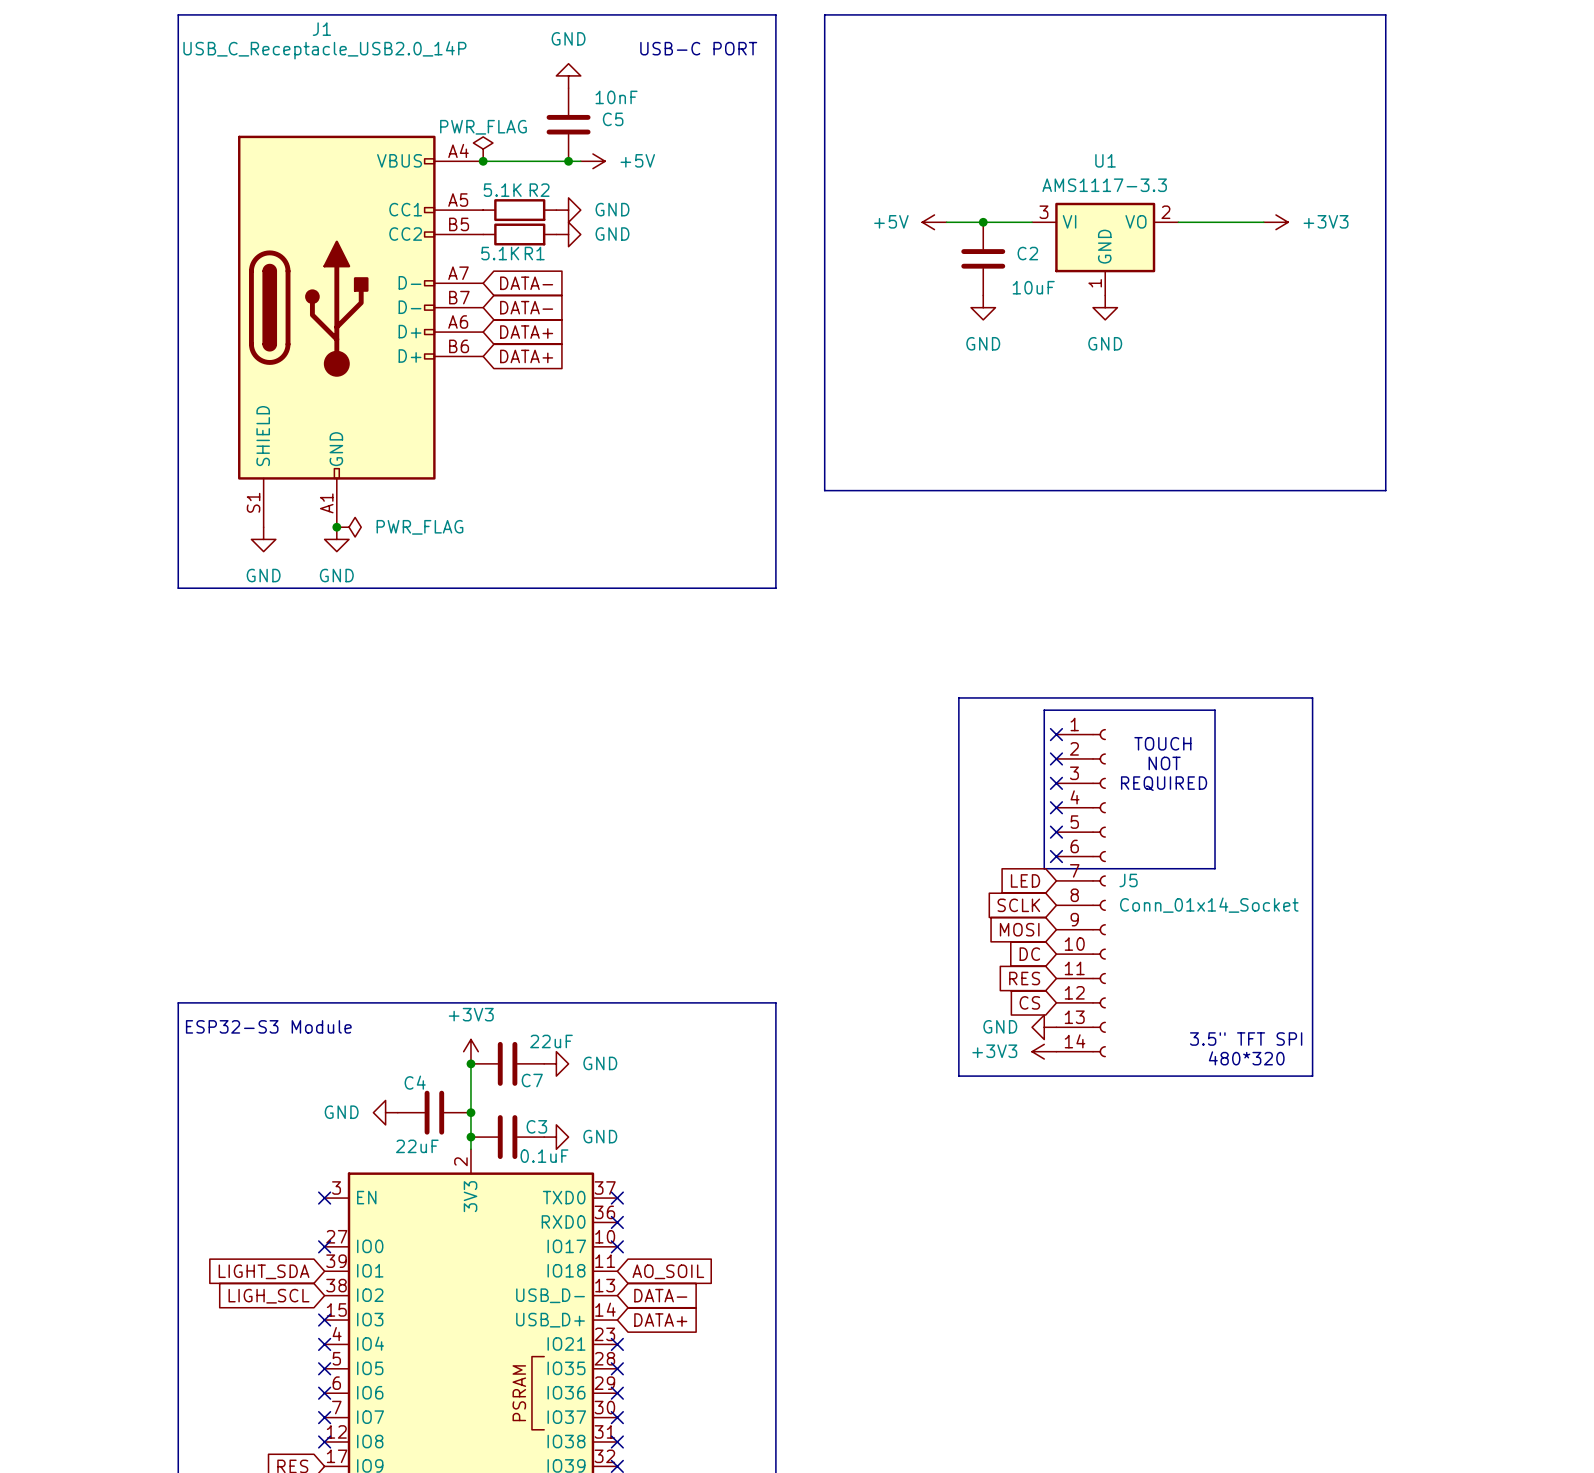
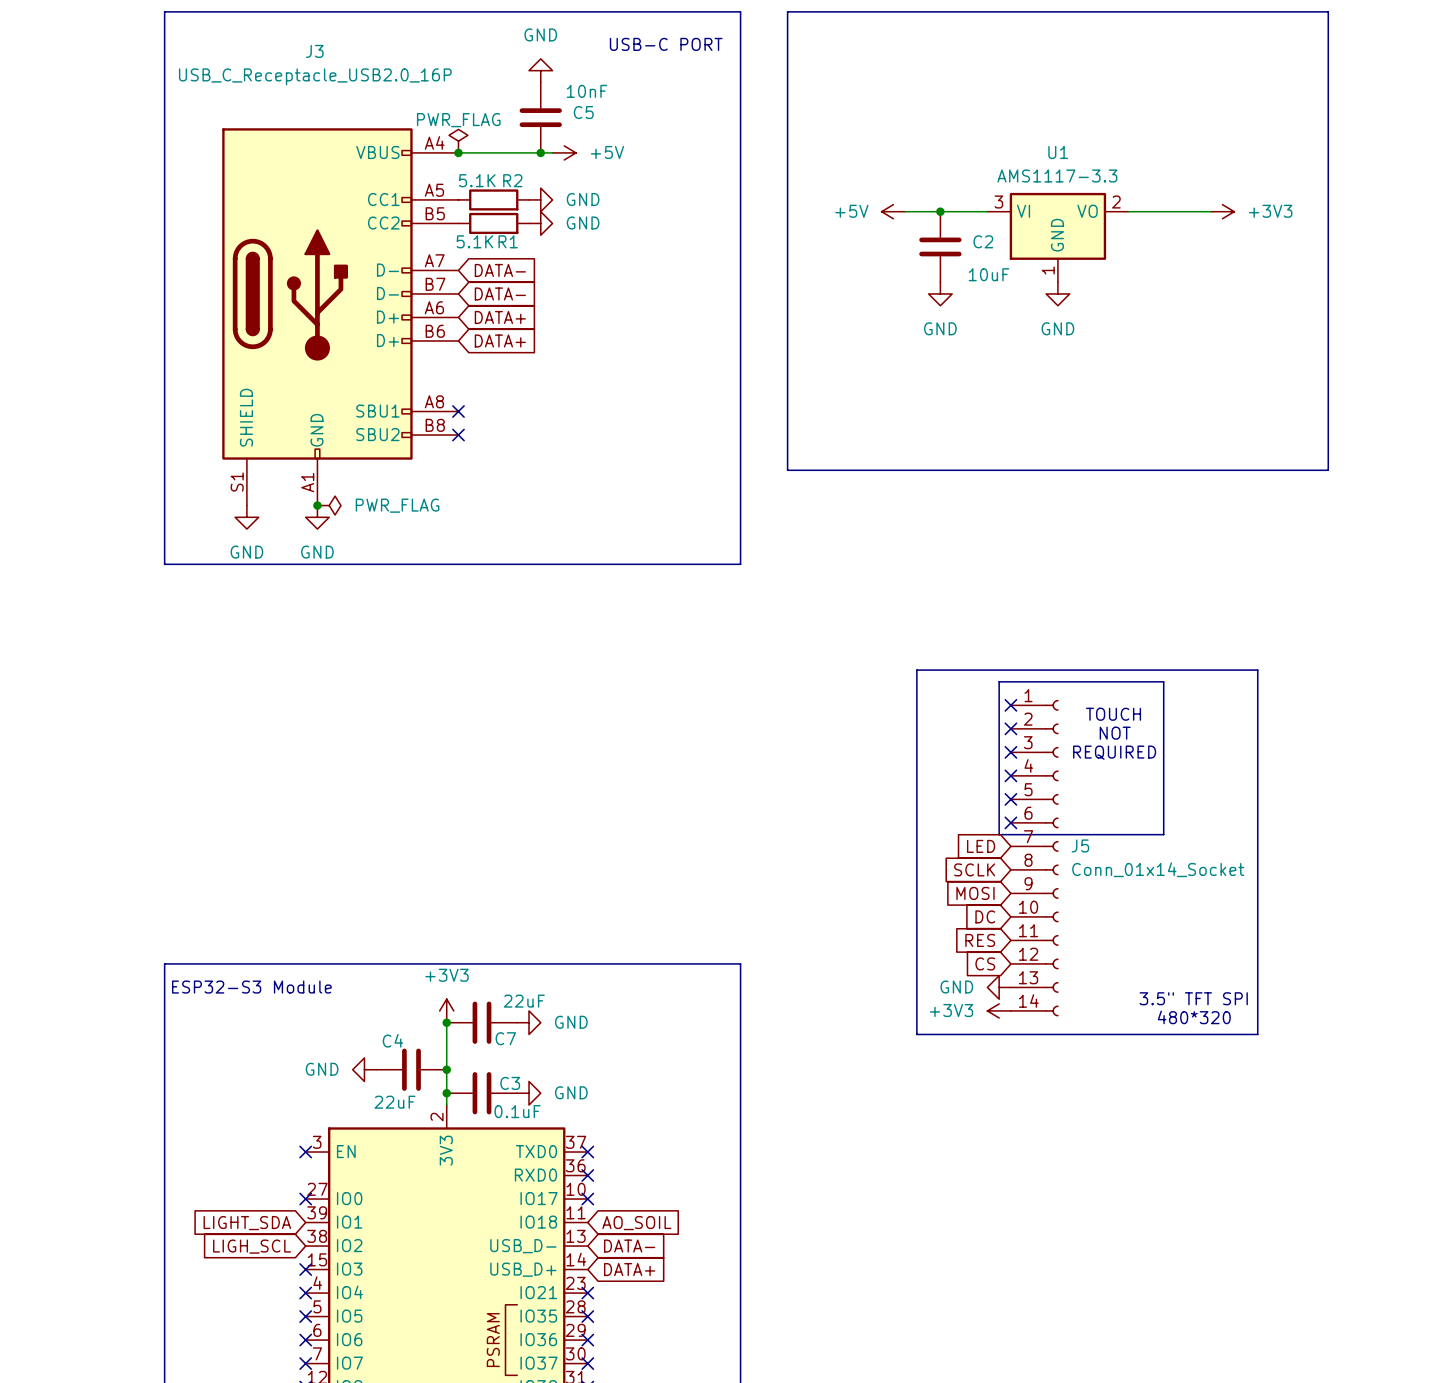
J1: USB_C_Receptacle_USB2.0_14P (360, 331) -> none
J3: none -> USB_C_Receptacle_USB2.0_16P (340, 316)
no-connect mark: none -> (458, 411)
no-connect mark: none -> (458, 435)

